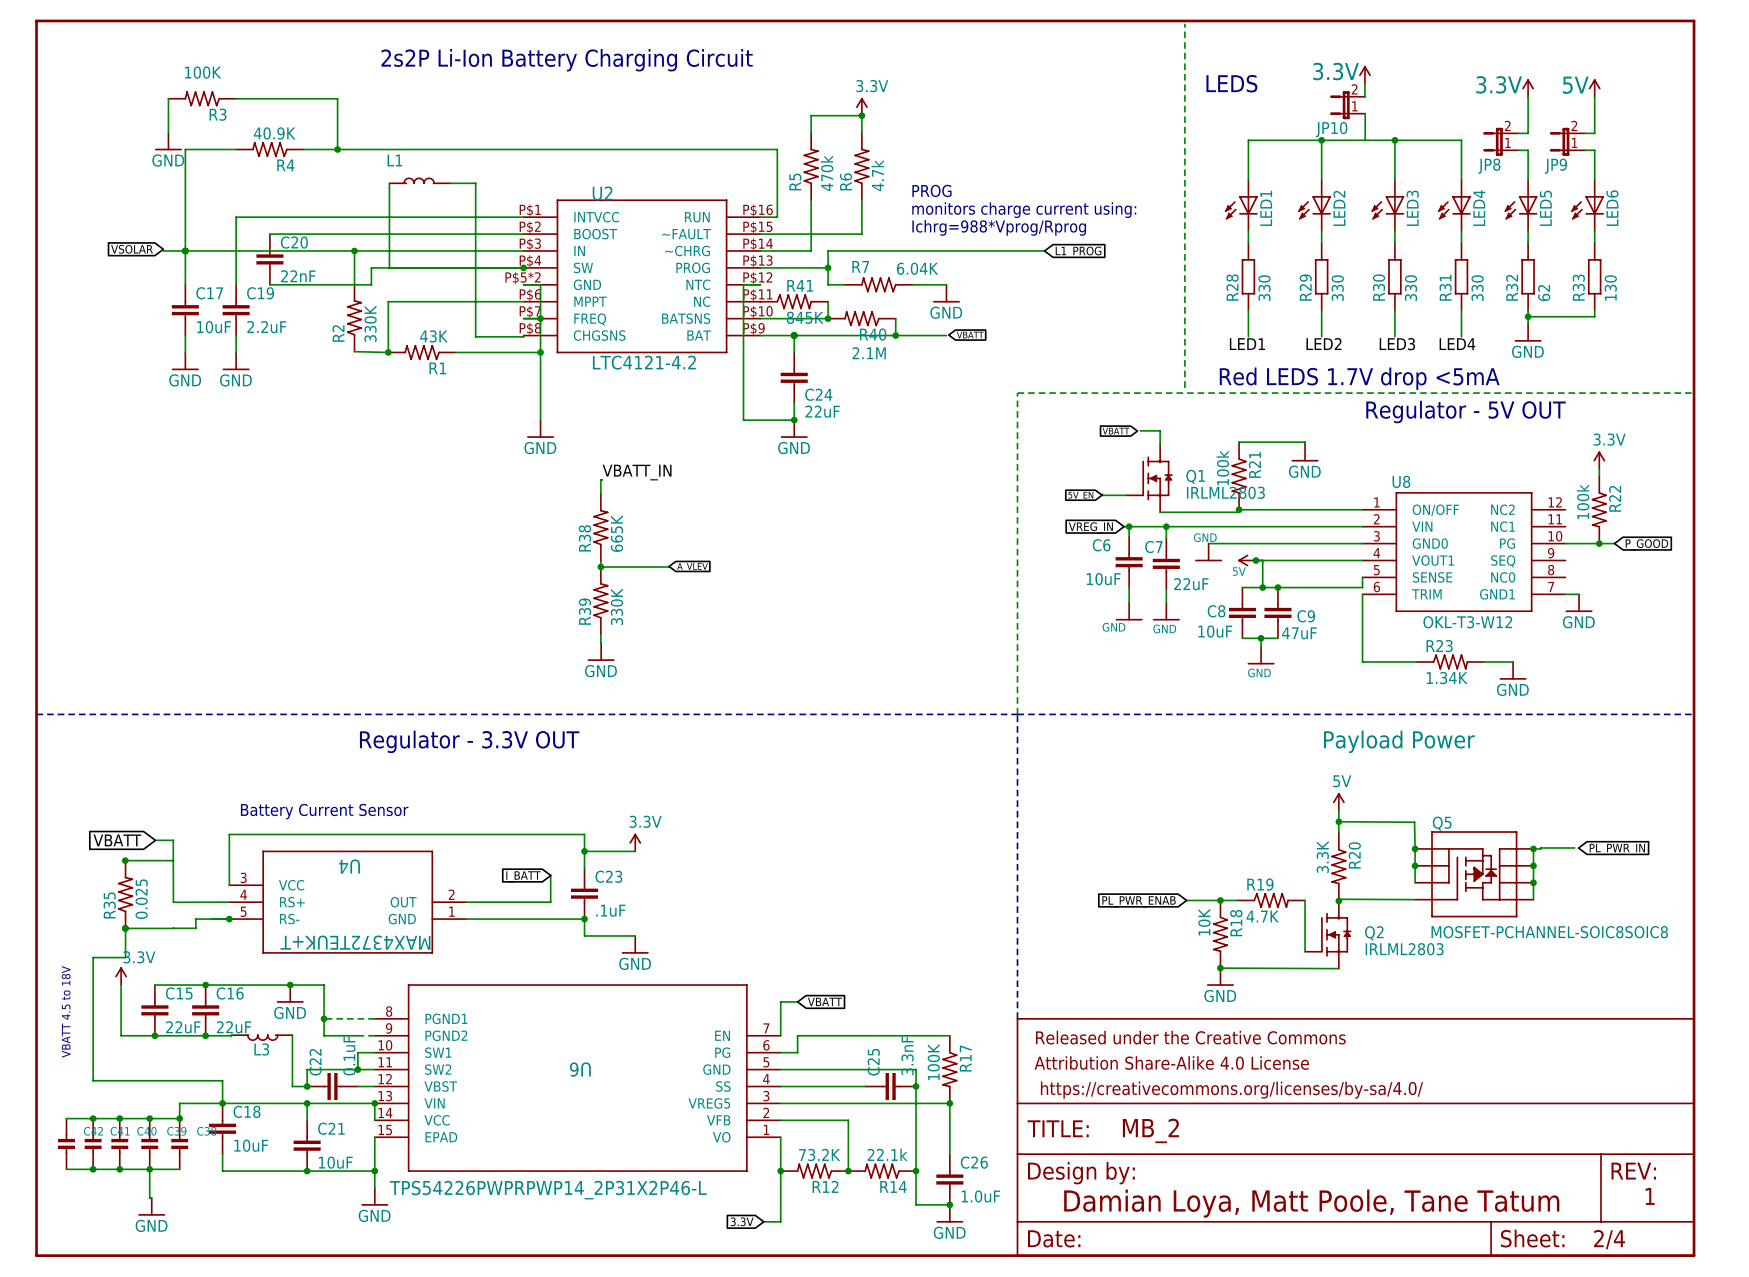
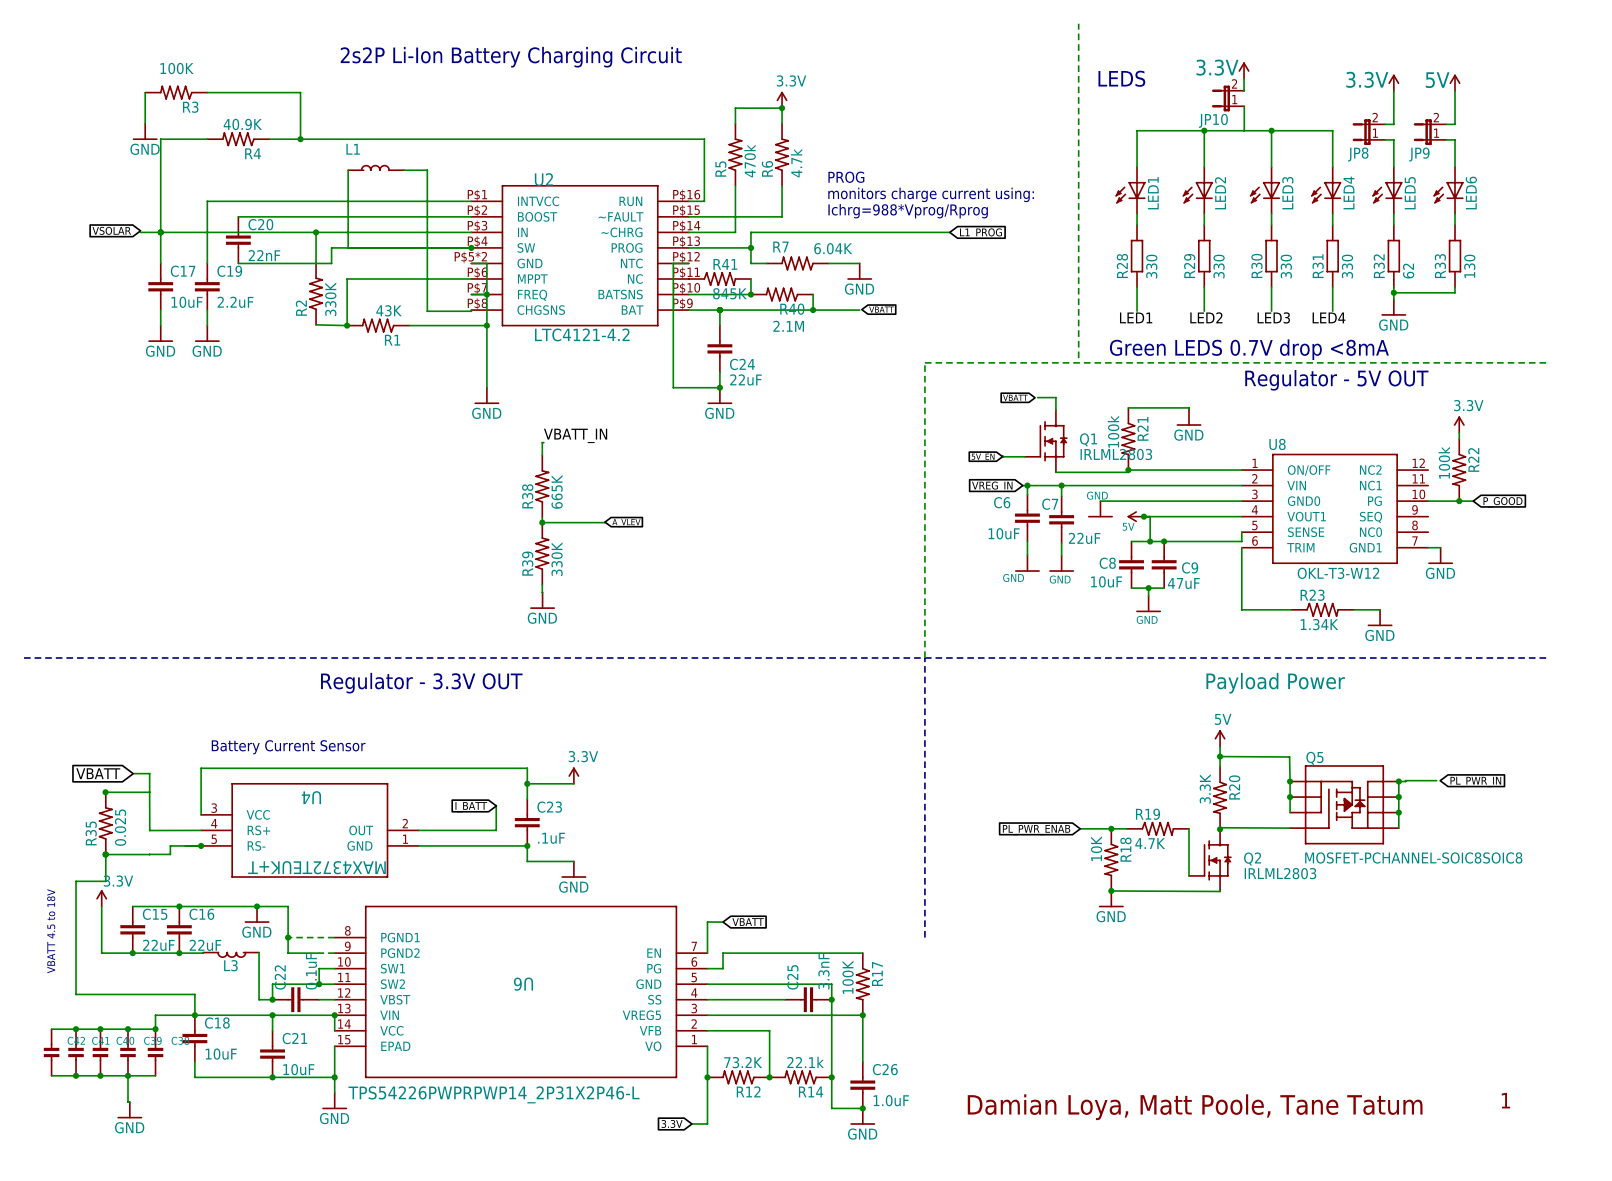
text: Red LEDS 1.7V drop <5mA (1359, 378) -> Green LEDS 0.7V drop <8mA (1249, 349)
part: (865, 638) -> none
part: (1355, 1137) -> none

